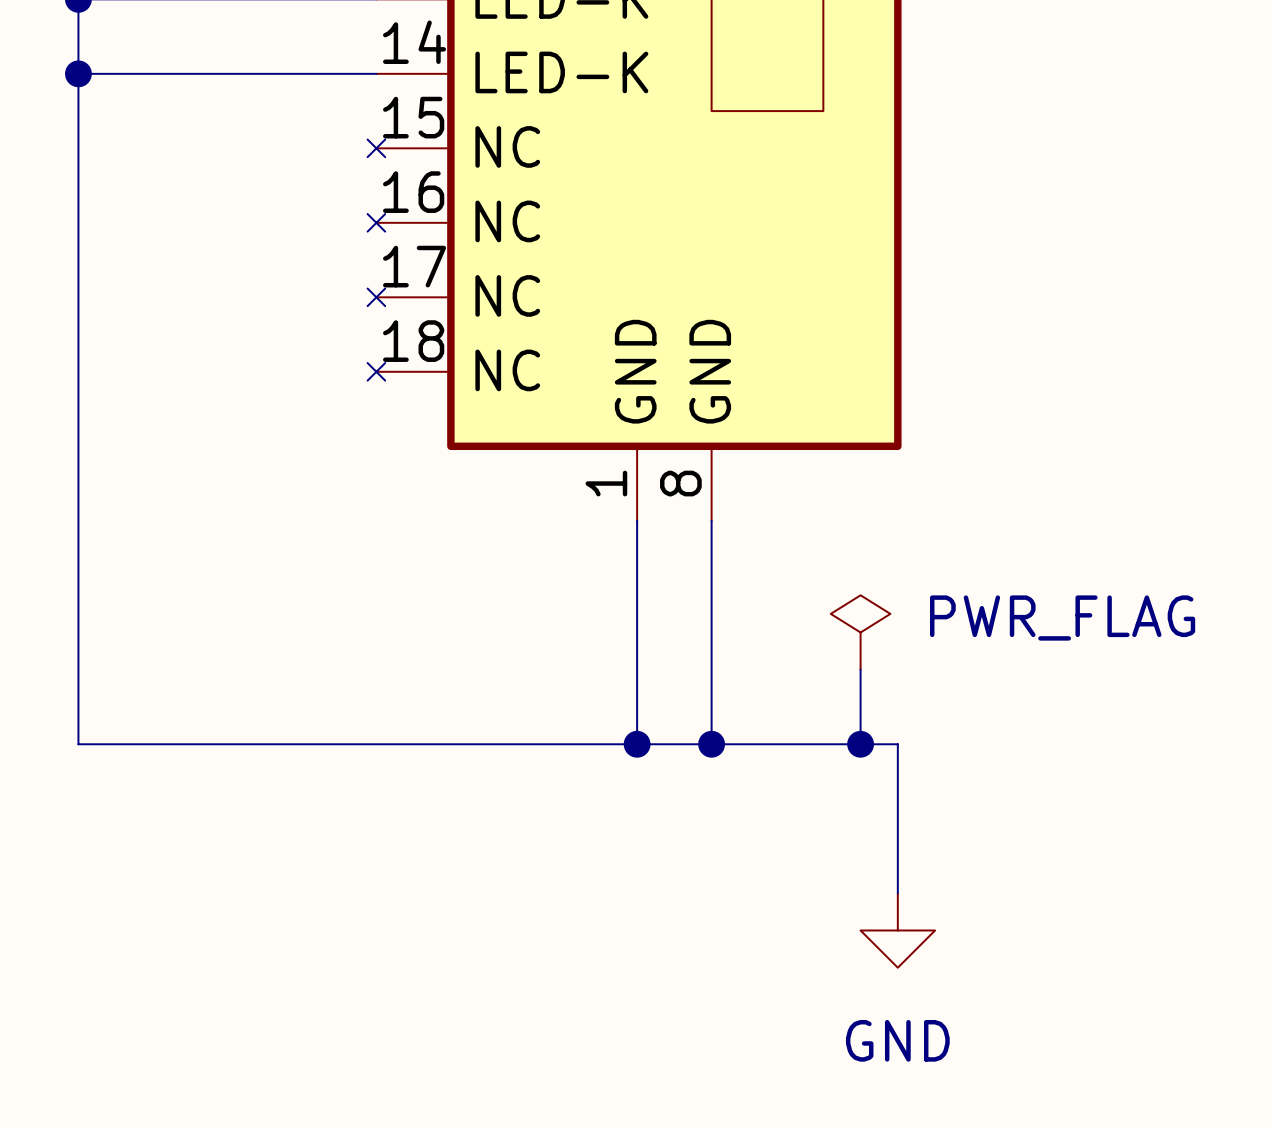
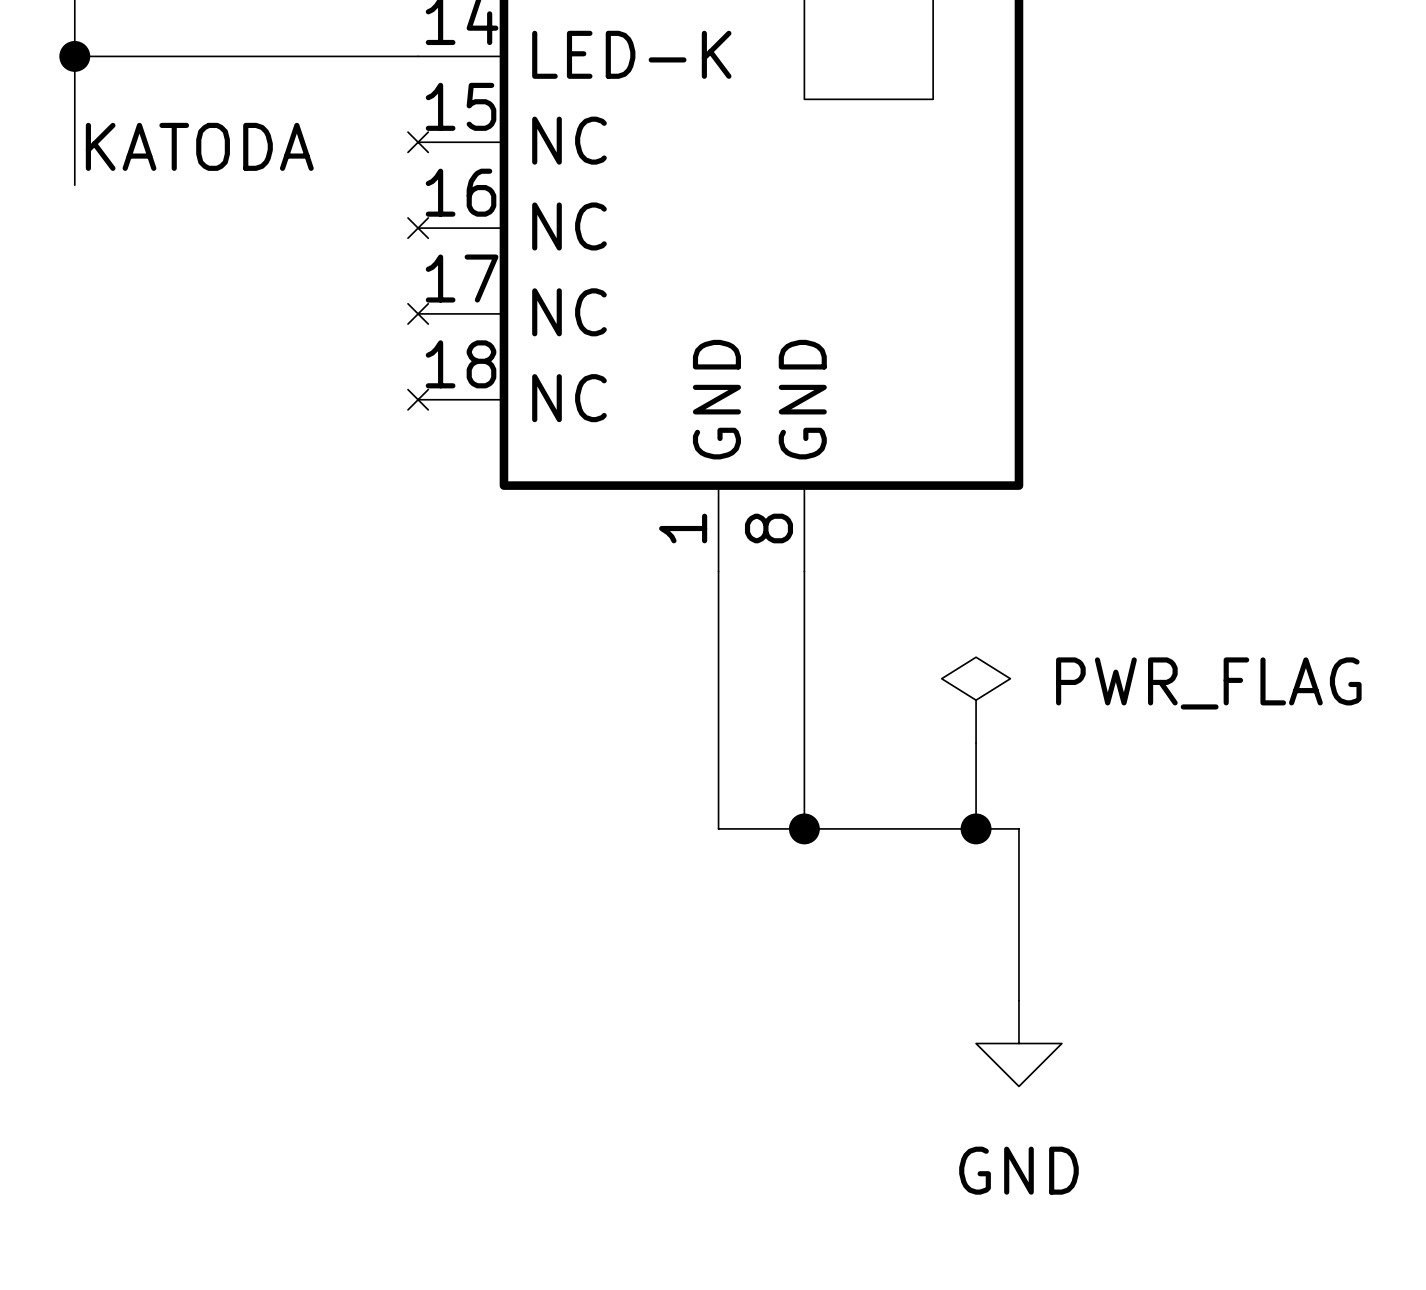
label: none -> KATODA (199, 146)
wire: (78, 185) (78, 744) (637, 744) -> none
junction: (637, 744) -> none

